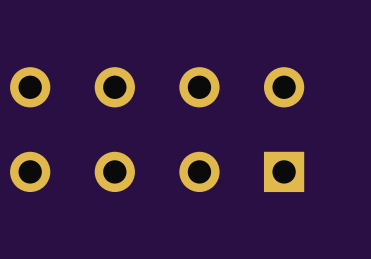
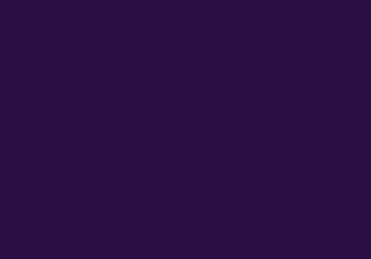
part: (157, 129) -> none

